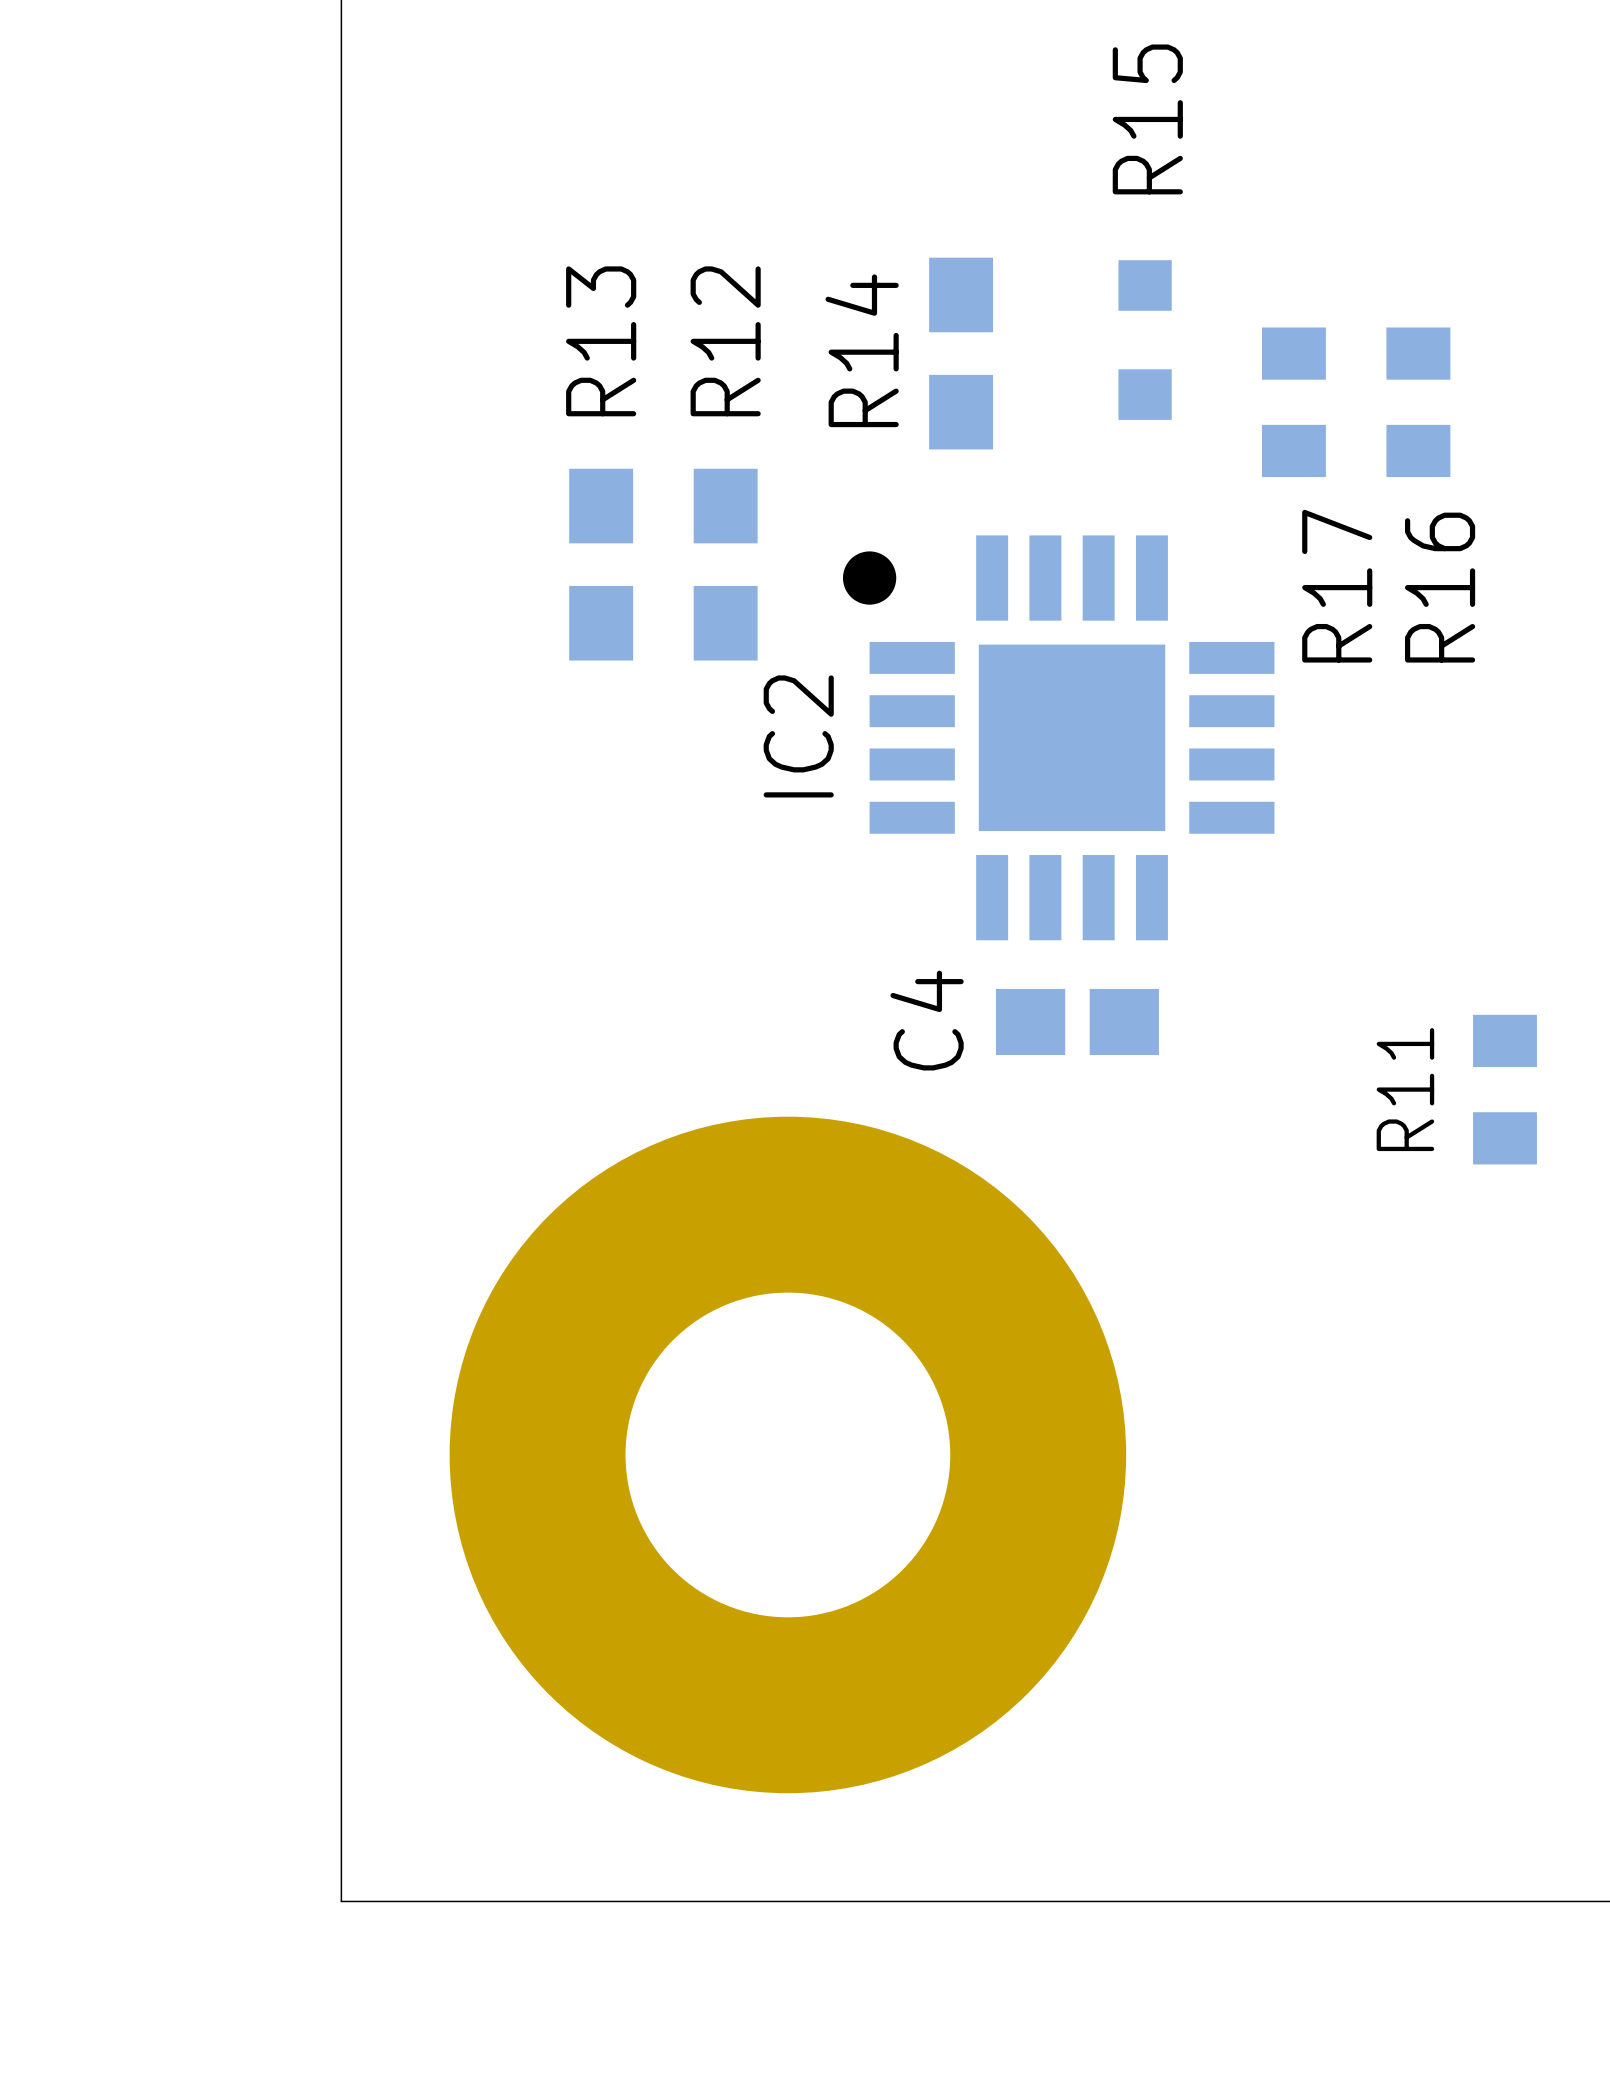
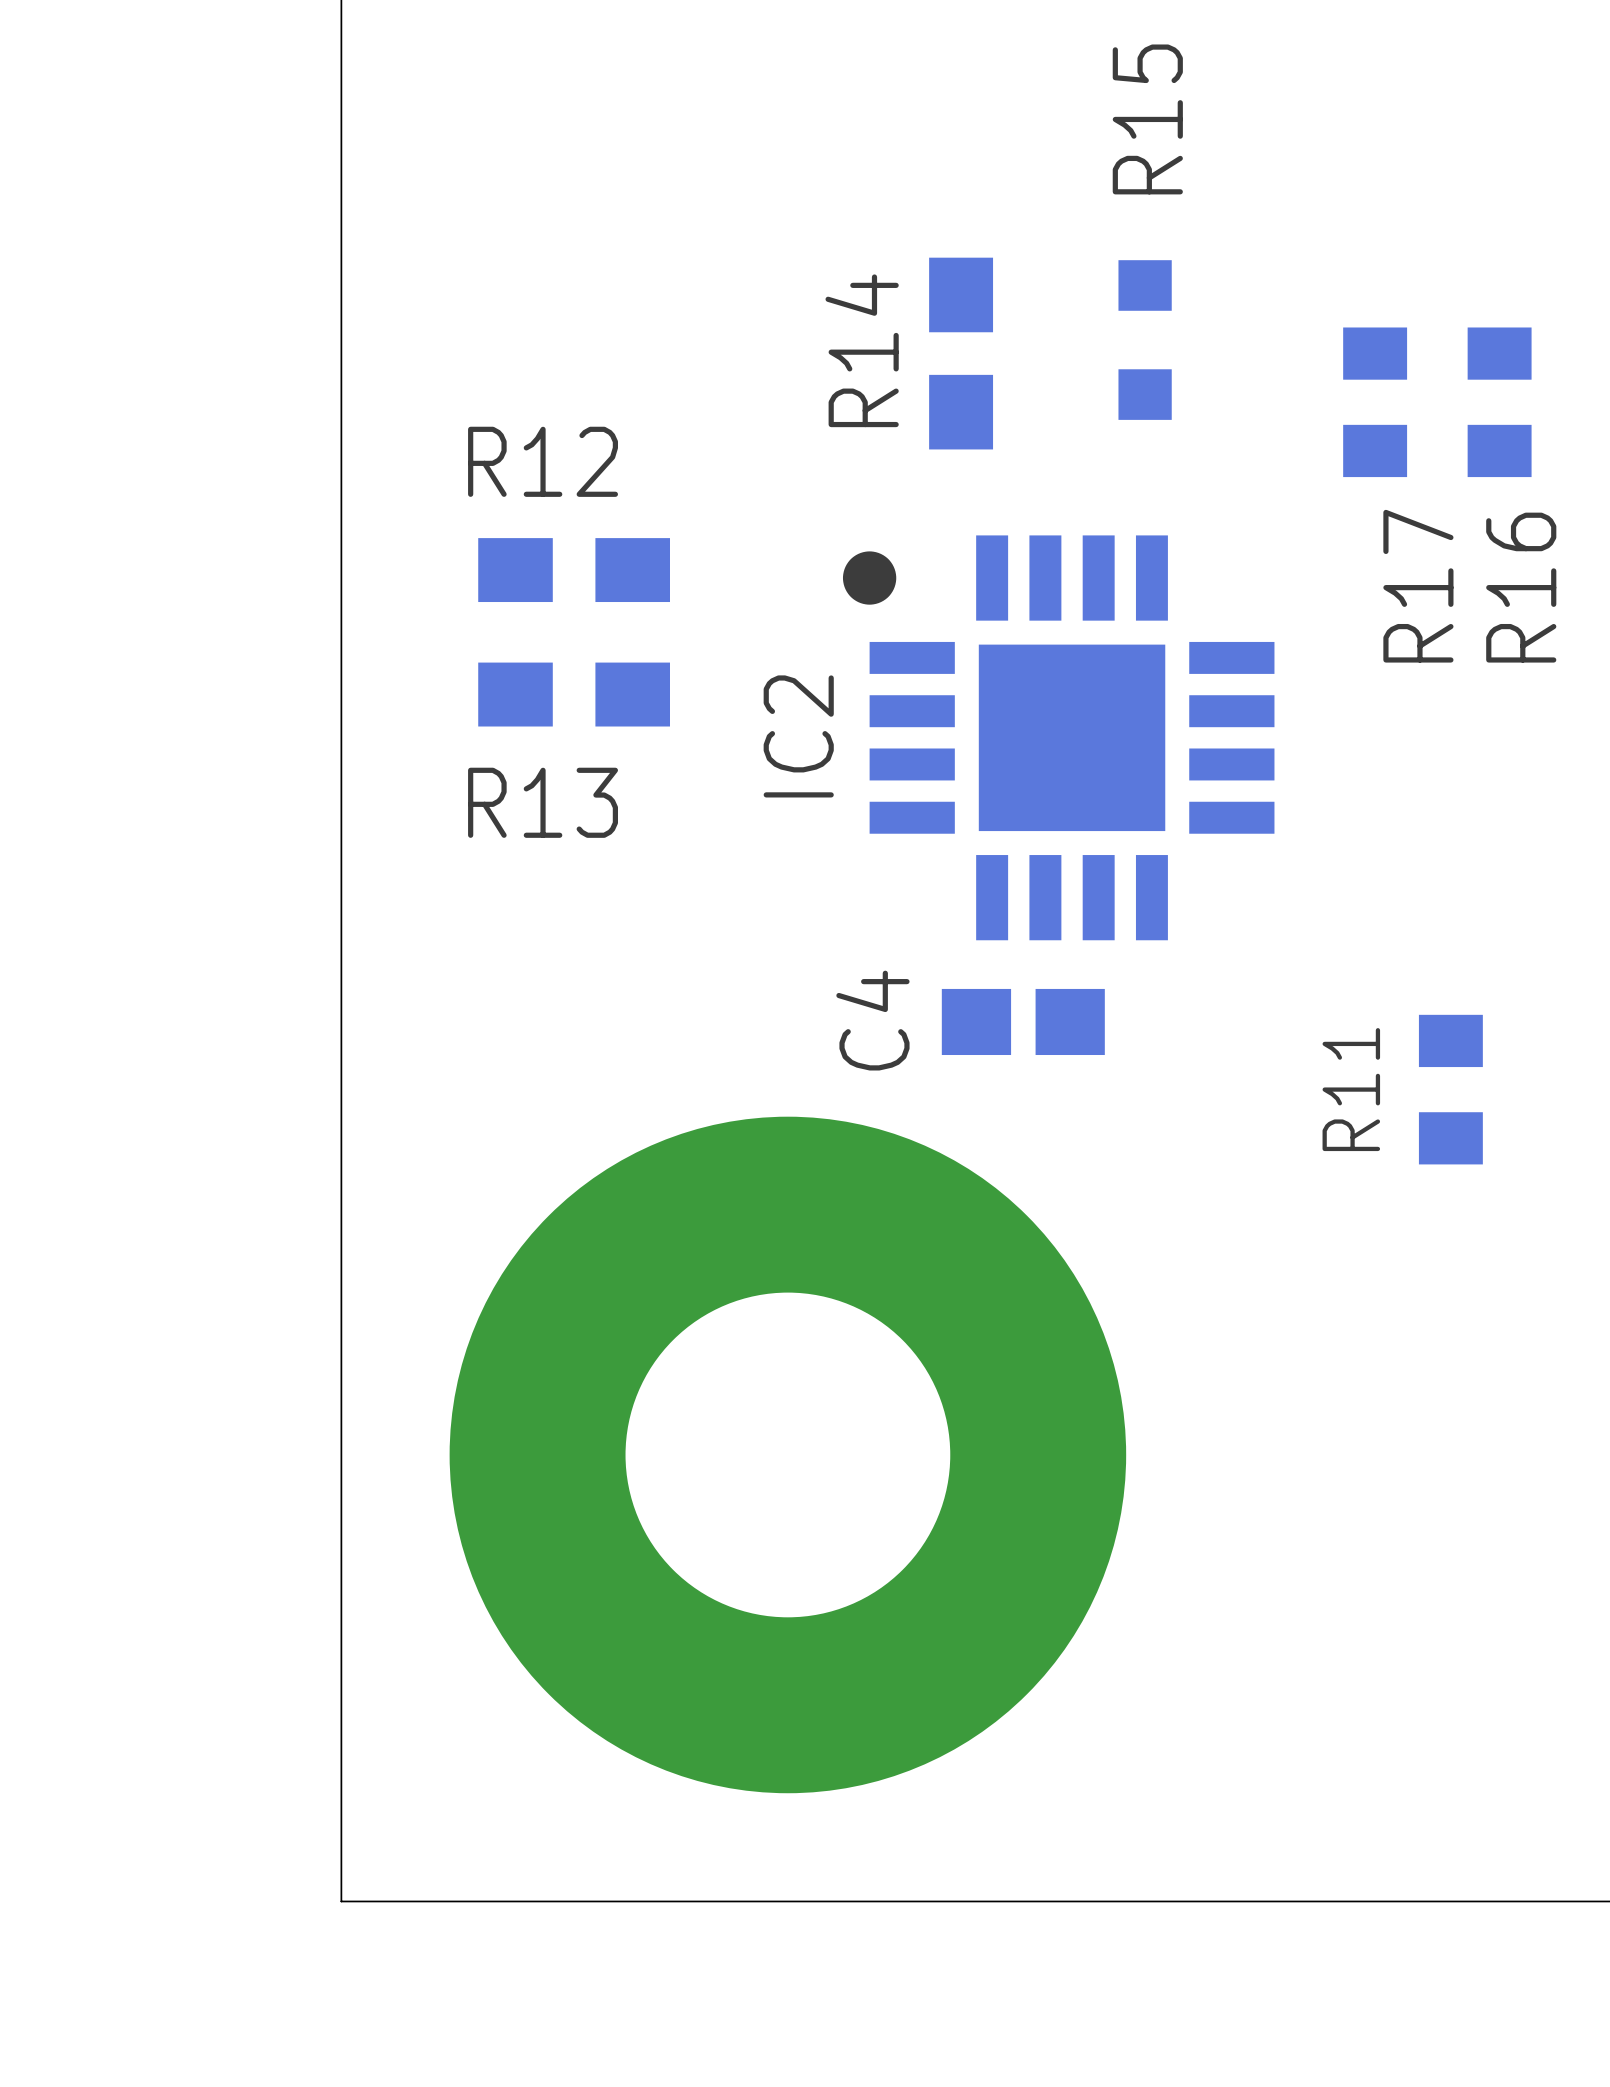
R13 name position: R13 (601, 341) -> R13 (543, 802)
R17 position: (1293, 402) -> (1375, 402)
R16 position: (1418, 402) -> (1499, 402)
R13 rotation: 0° (601, 564) -> 90° clockwise (574, 694)
R13 position: (601, 564) -> (574, 694)
R12 rotation: 0° (725, 564) -> 90° clockwise (574, 570)
R12 position: (725, 564) -> (574, 570)
C4 position: (1077, 1021) -> (1023, 1021)
R11 position: (1505, 1089) -> (1450, 1089)

